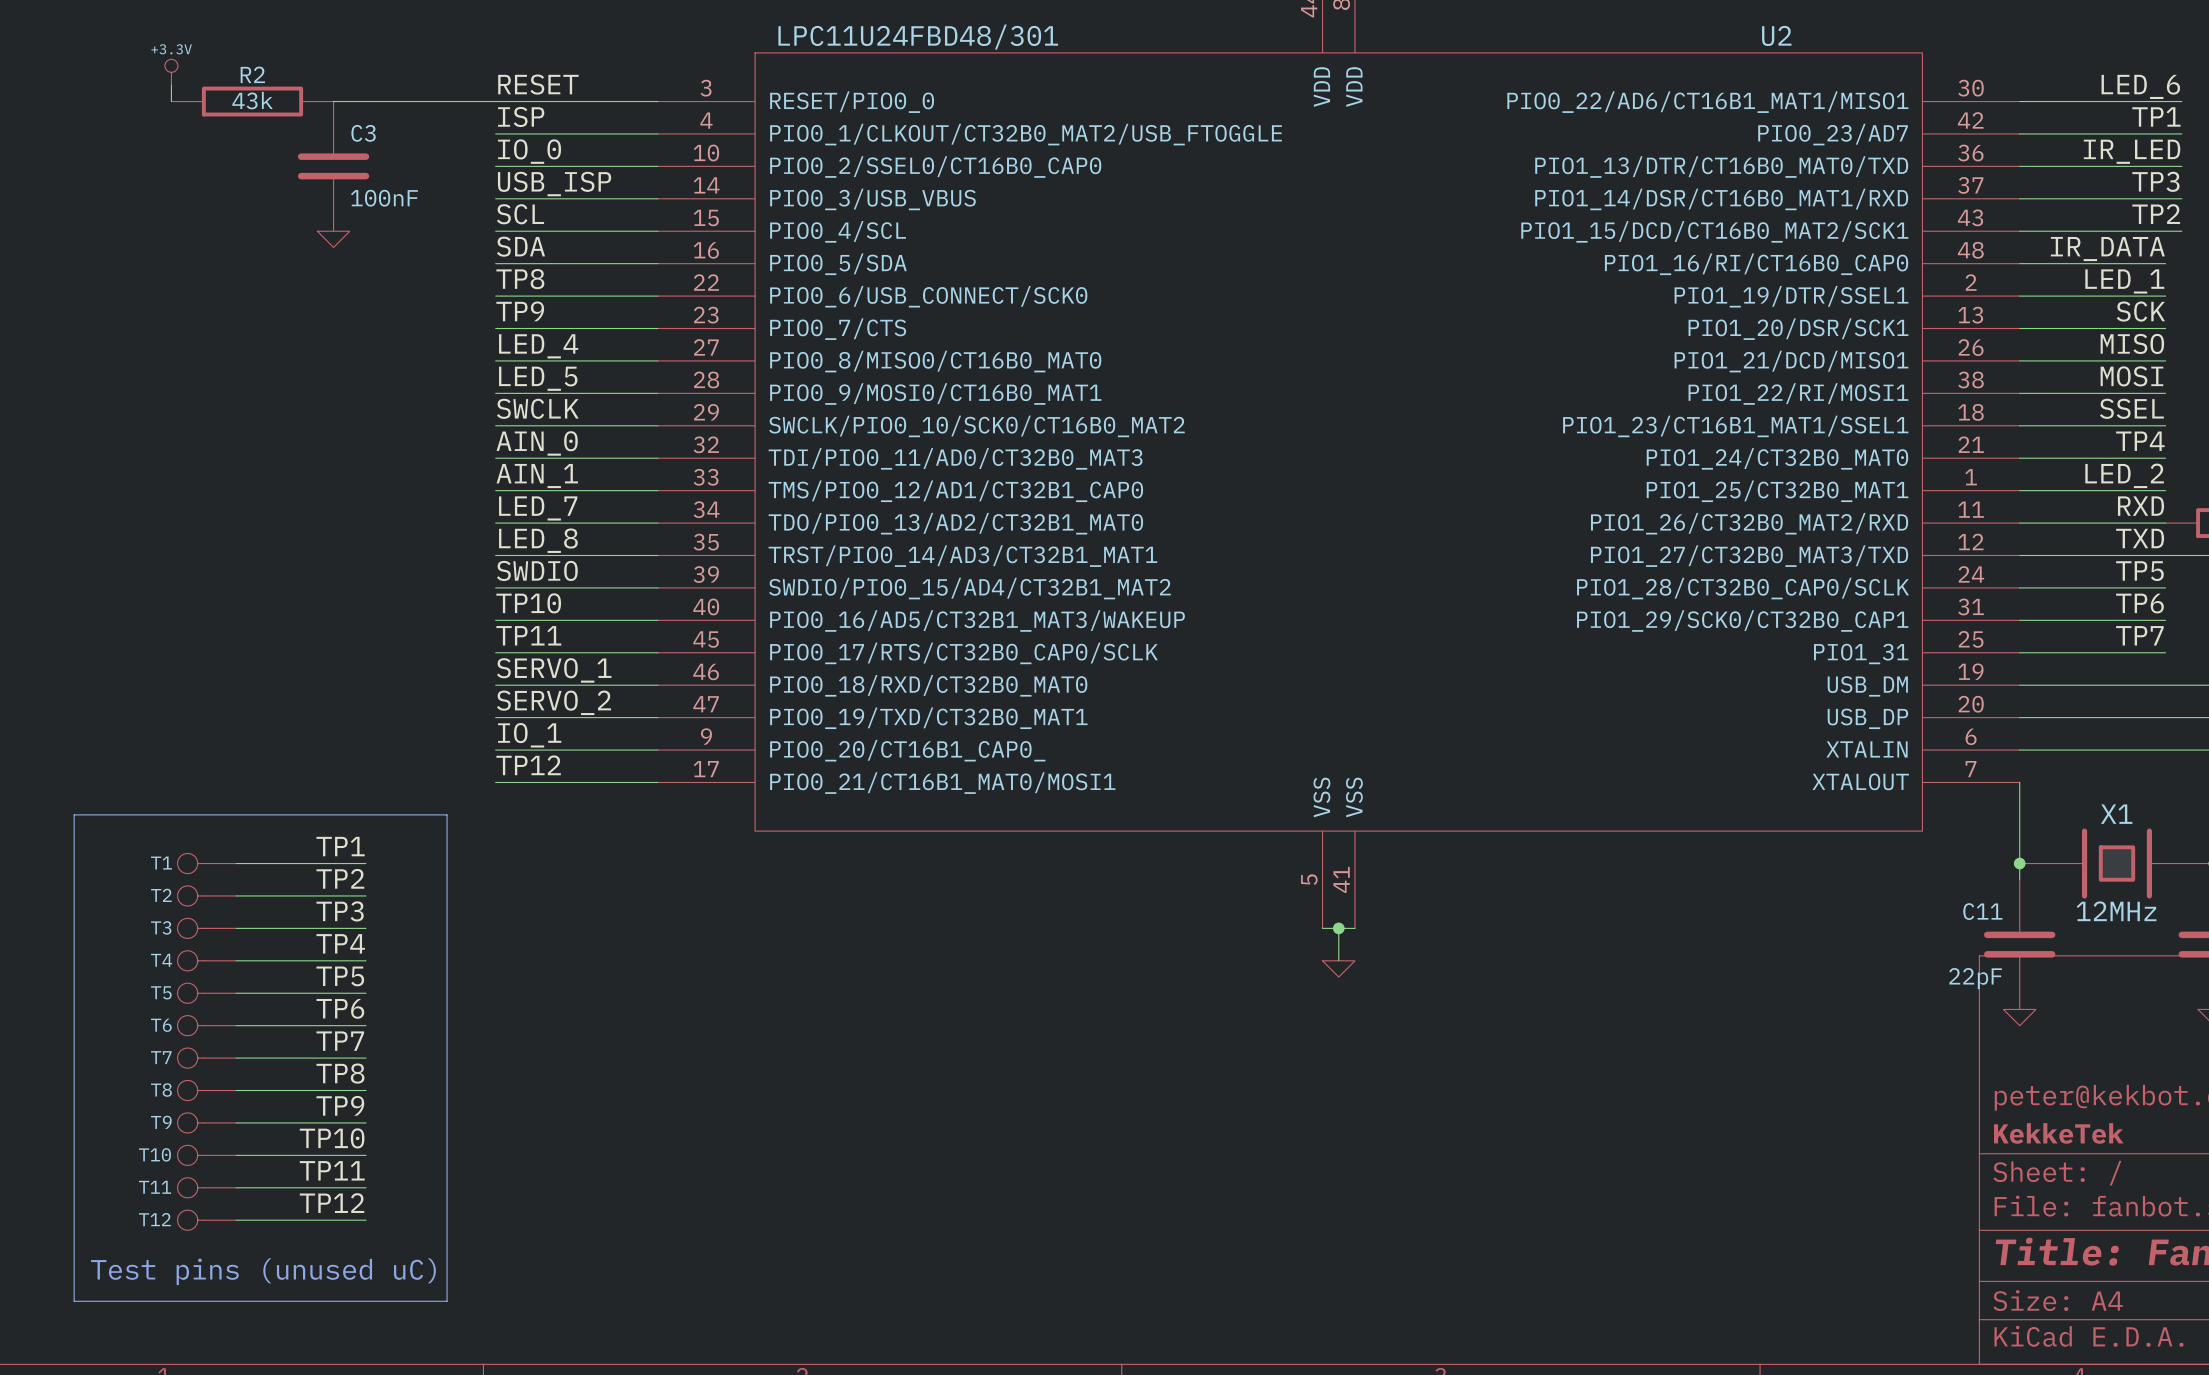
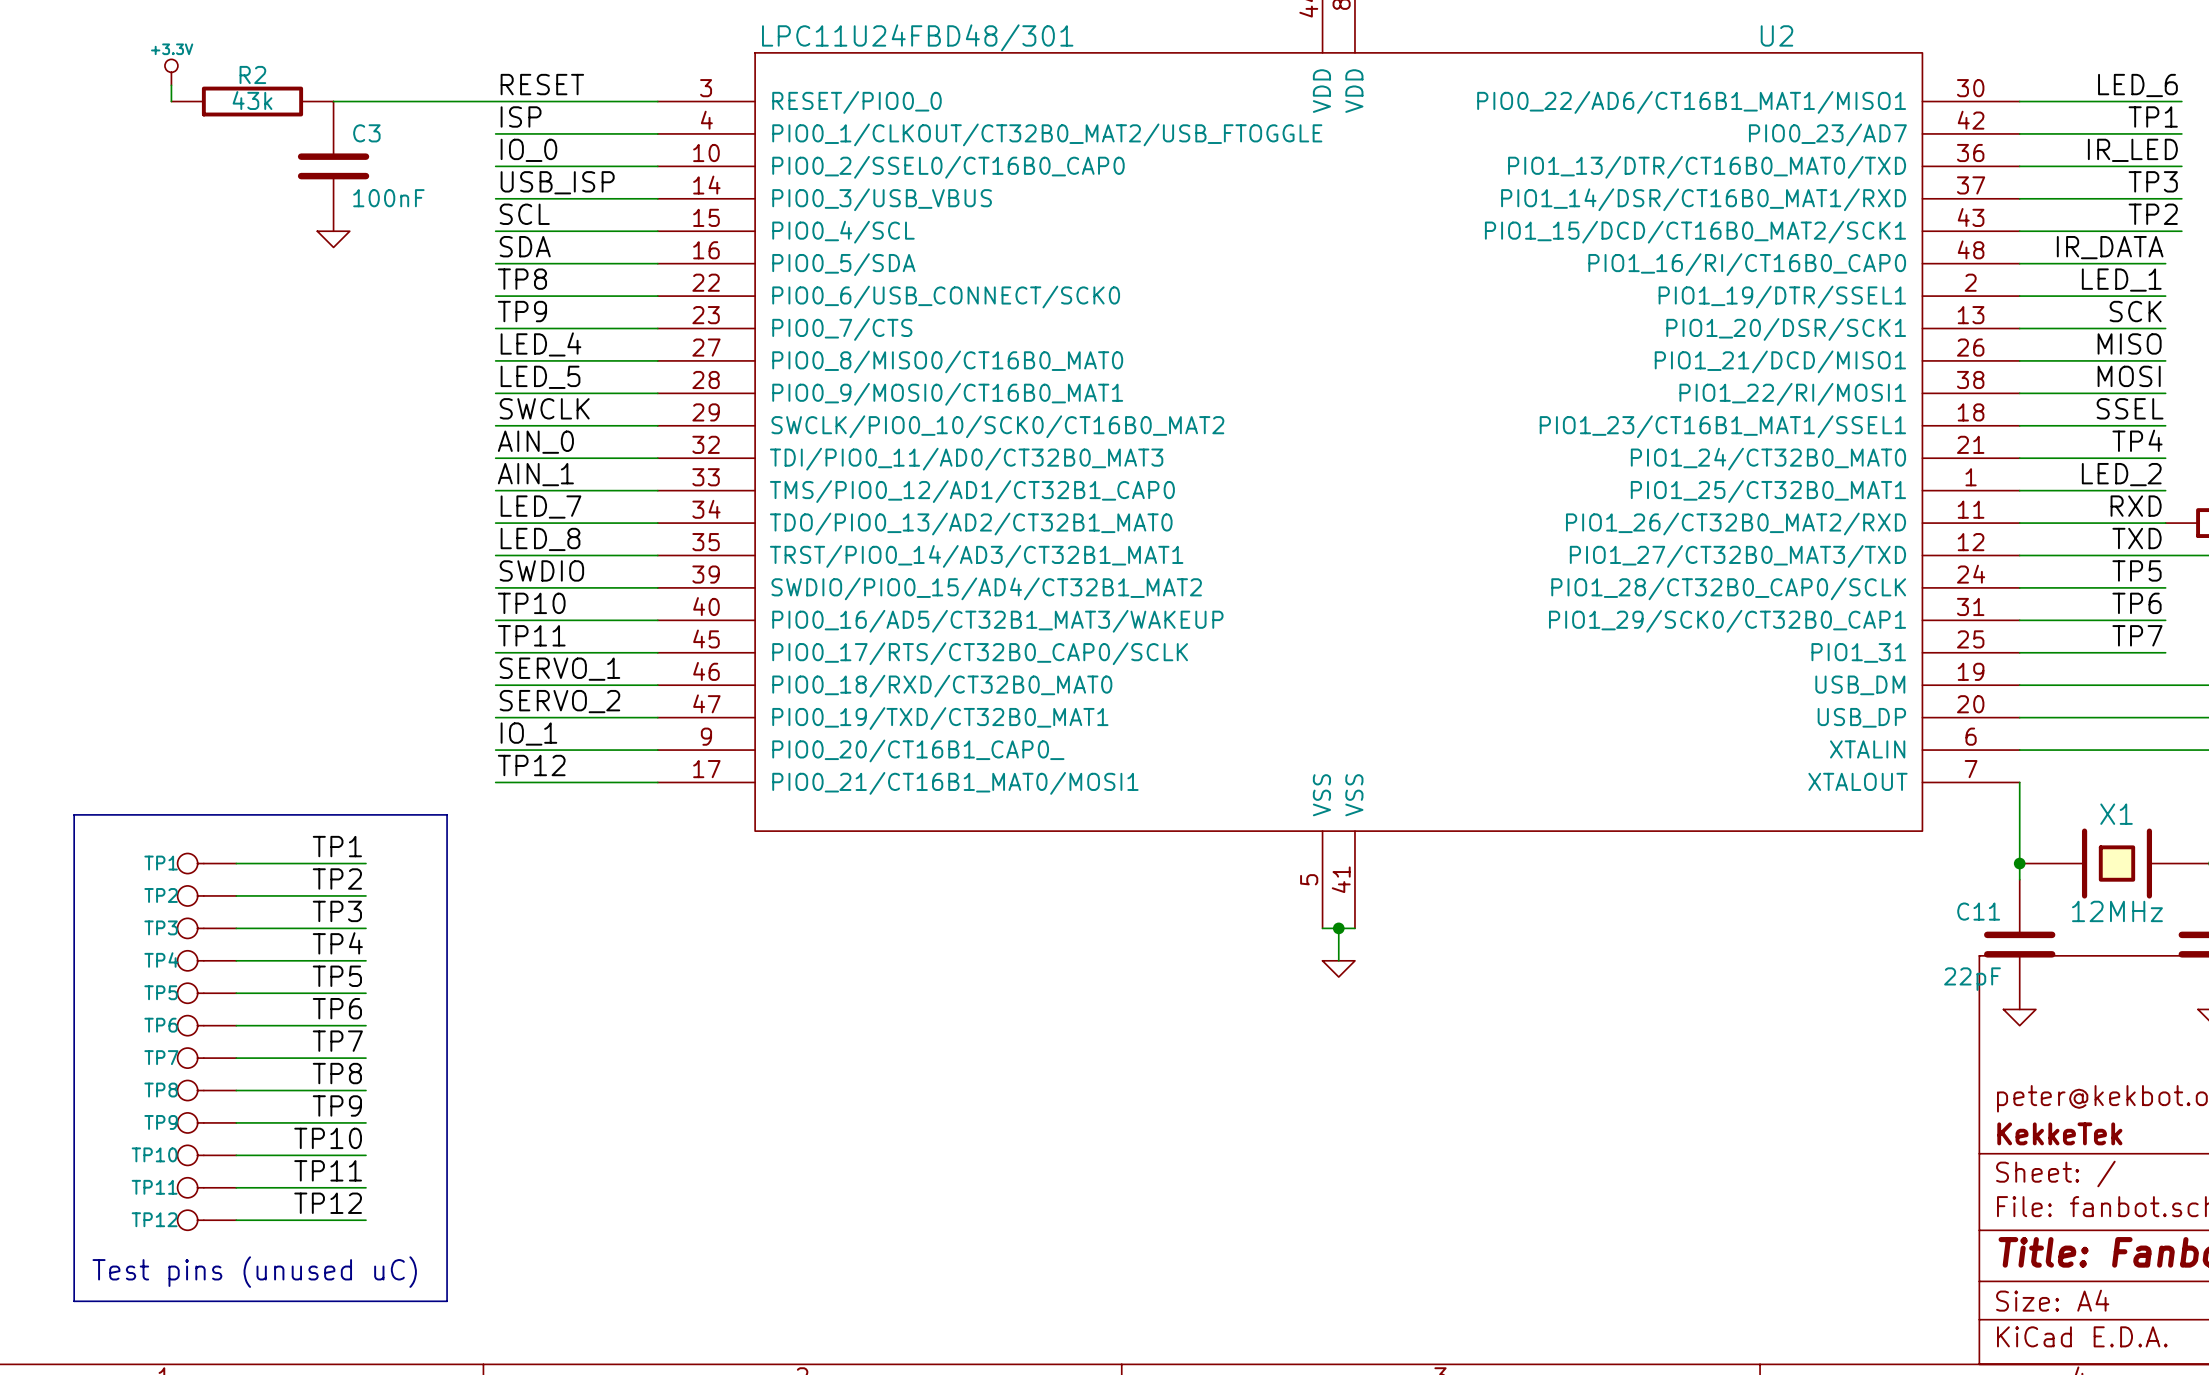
T1 name: T1 (161, 863) -> TP1 (161, 863)
T2 name: T2 (161, 895) -> TP2 (161, 895)
T3 name: T3 (161, 927) -> TP3 (161, 927)
T4 name: T4 (161, 960) -> TP4 (161, 960)
T5 name: T5 (161, 992) -> TP5 (161, 992)
T6 name: T6 (161, 1025) -> TP6 (161, 1025)
T7 name: T7 (161, 1057) -> TP7 (161, 1057)
T8 name: T8 (161, 1090) -> TP8 (161, 1090)
T9 name: T9 (161, 1122) -> TP9 (161, 1122)
T10 name: T10 (154, 1154) -> TP10 (154, 1154)
T11 name: T11 (155, 1187) -> TP11 (154, 1187)
T12 name: T12 (154, 1219) -> TP12 (154, 1219)

